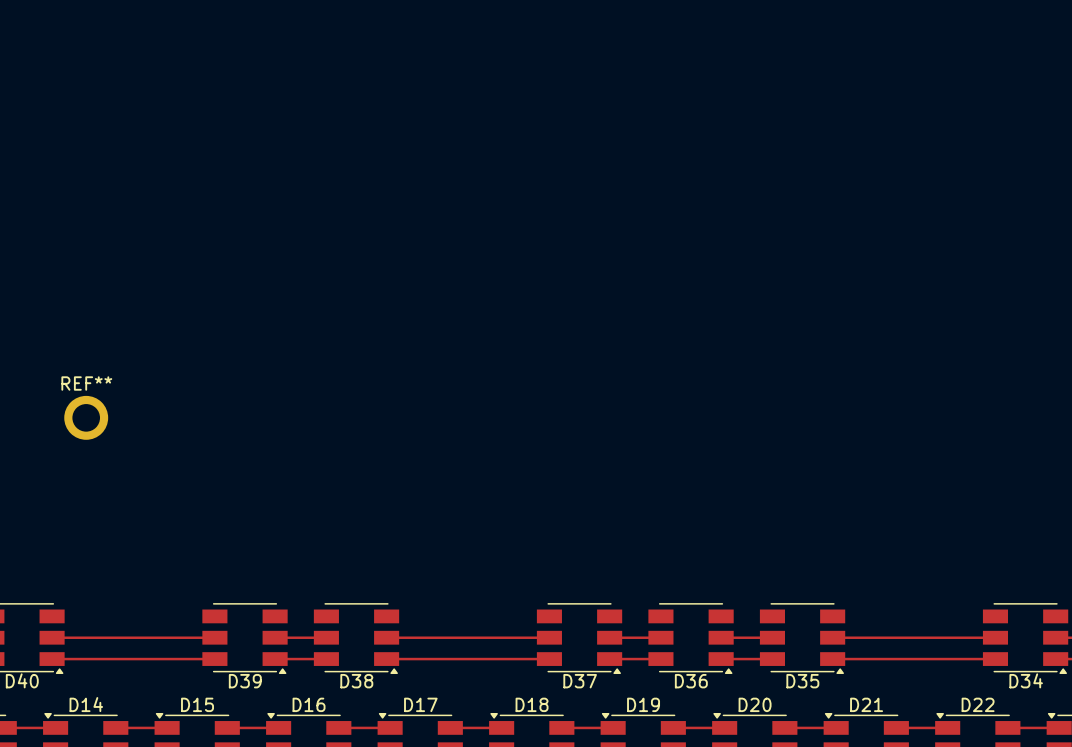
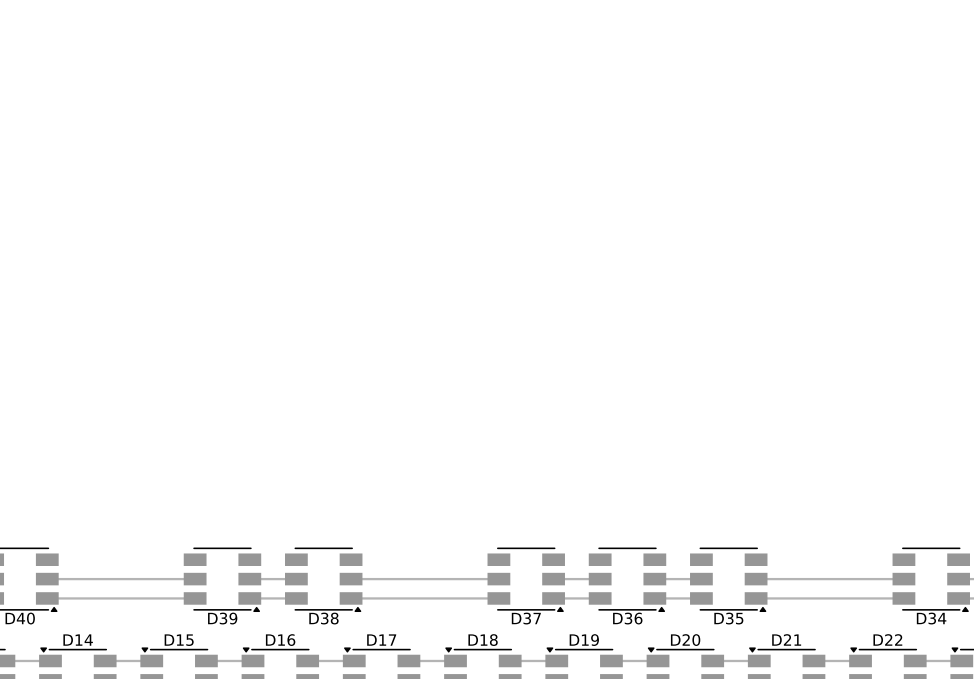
REF**: (86, 417) -> none

